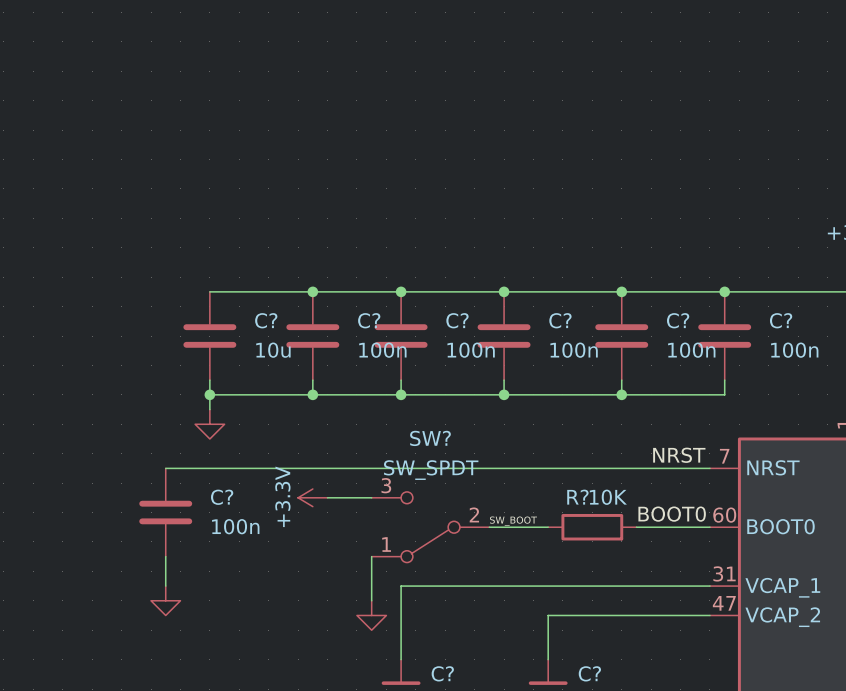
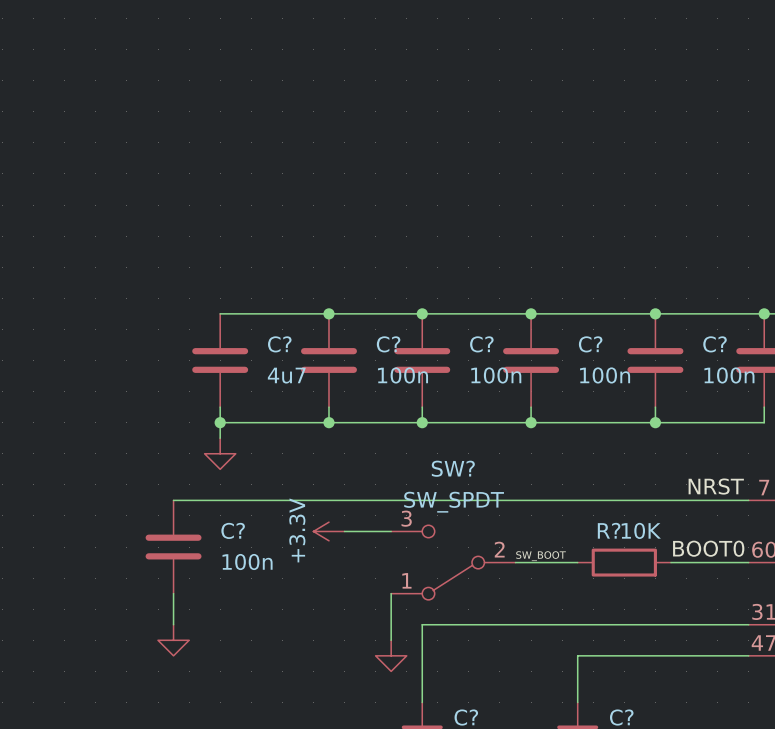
C? value: 10u (273, 350) -> 4u7 (286, 375)

